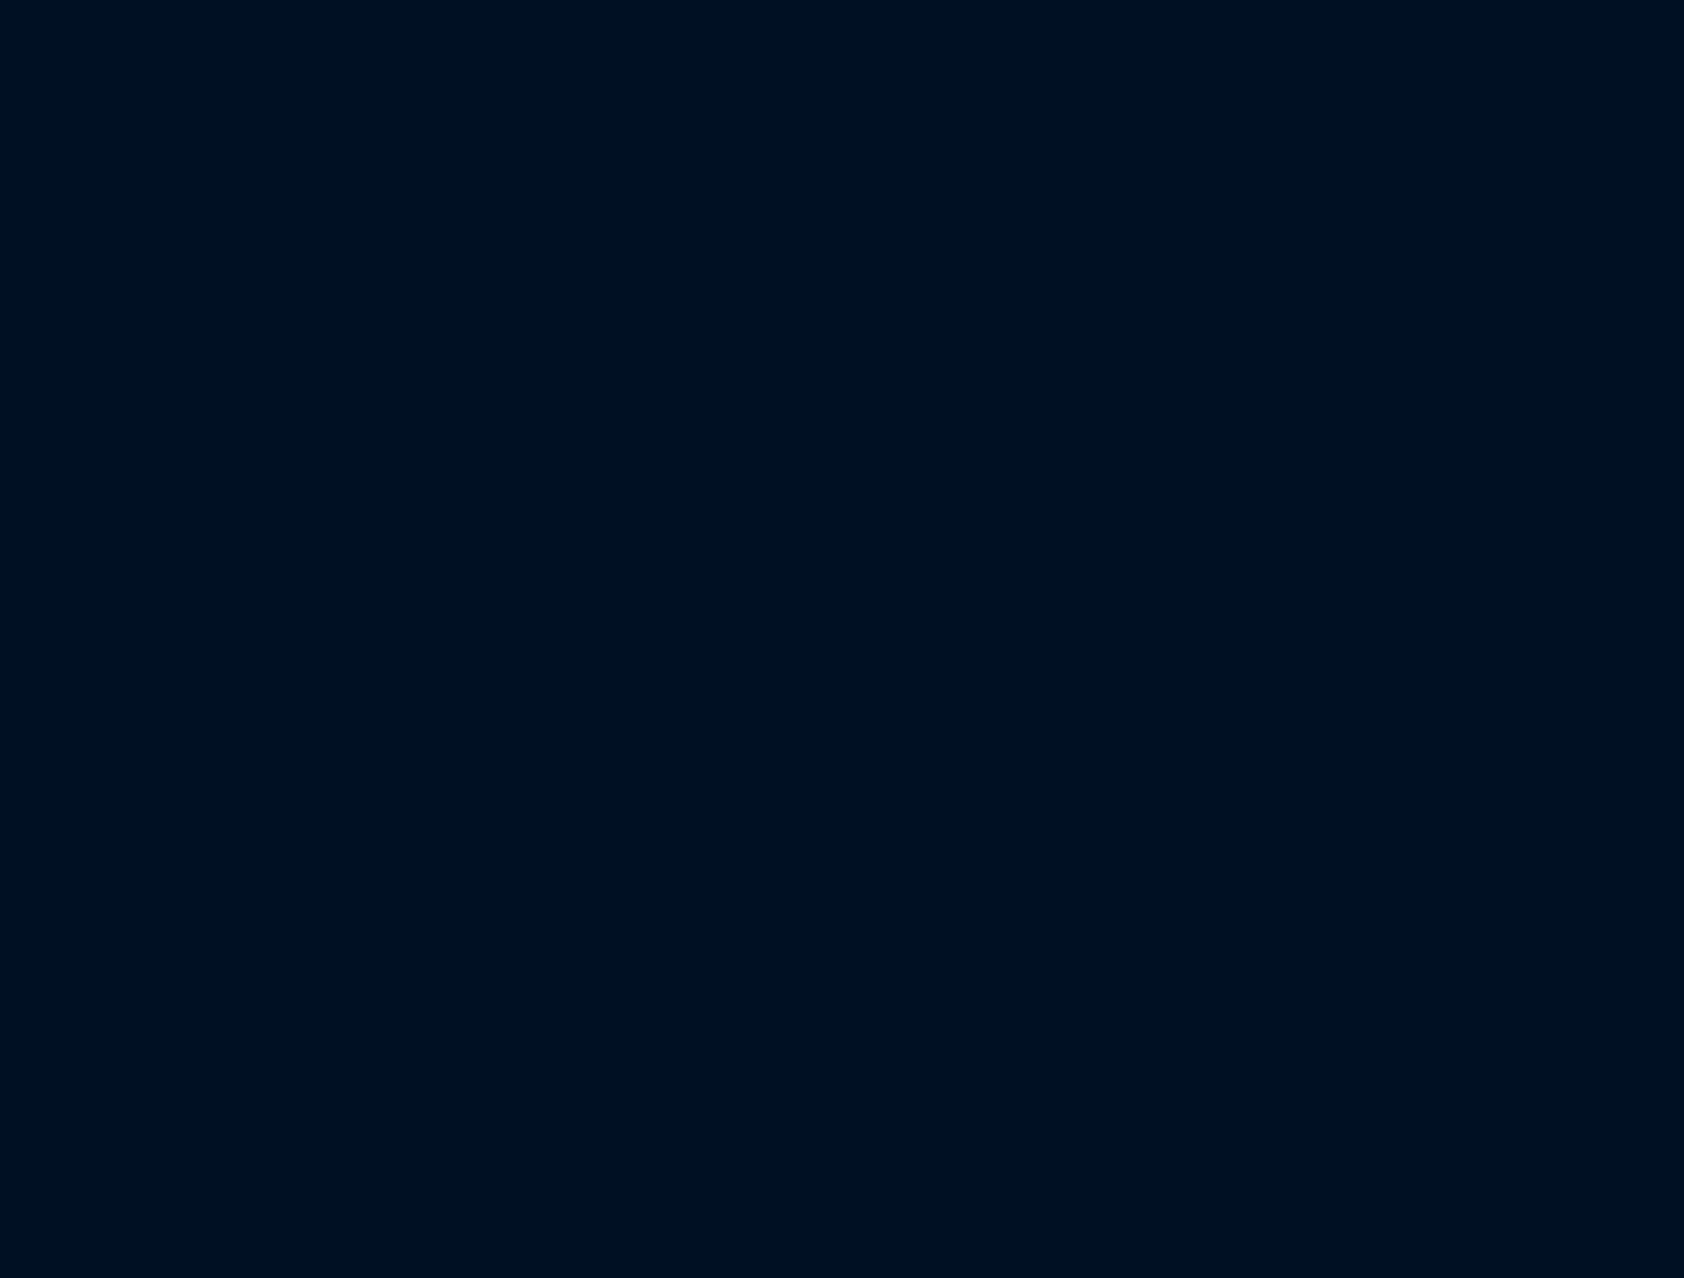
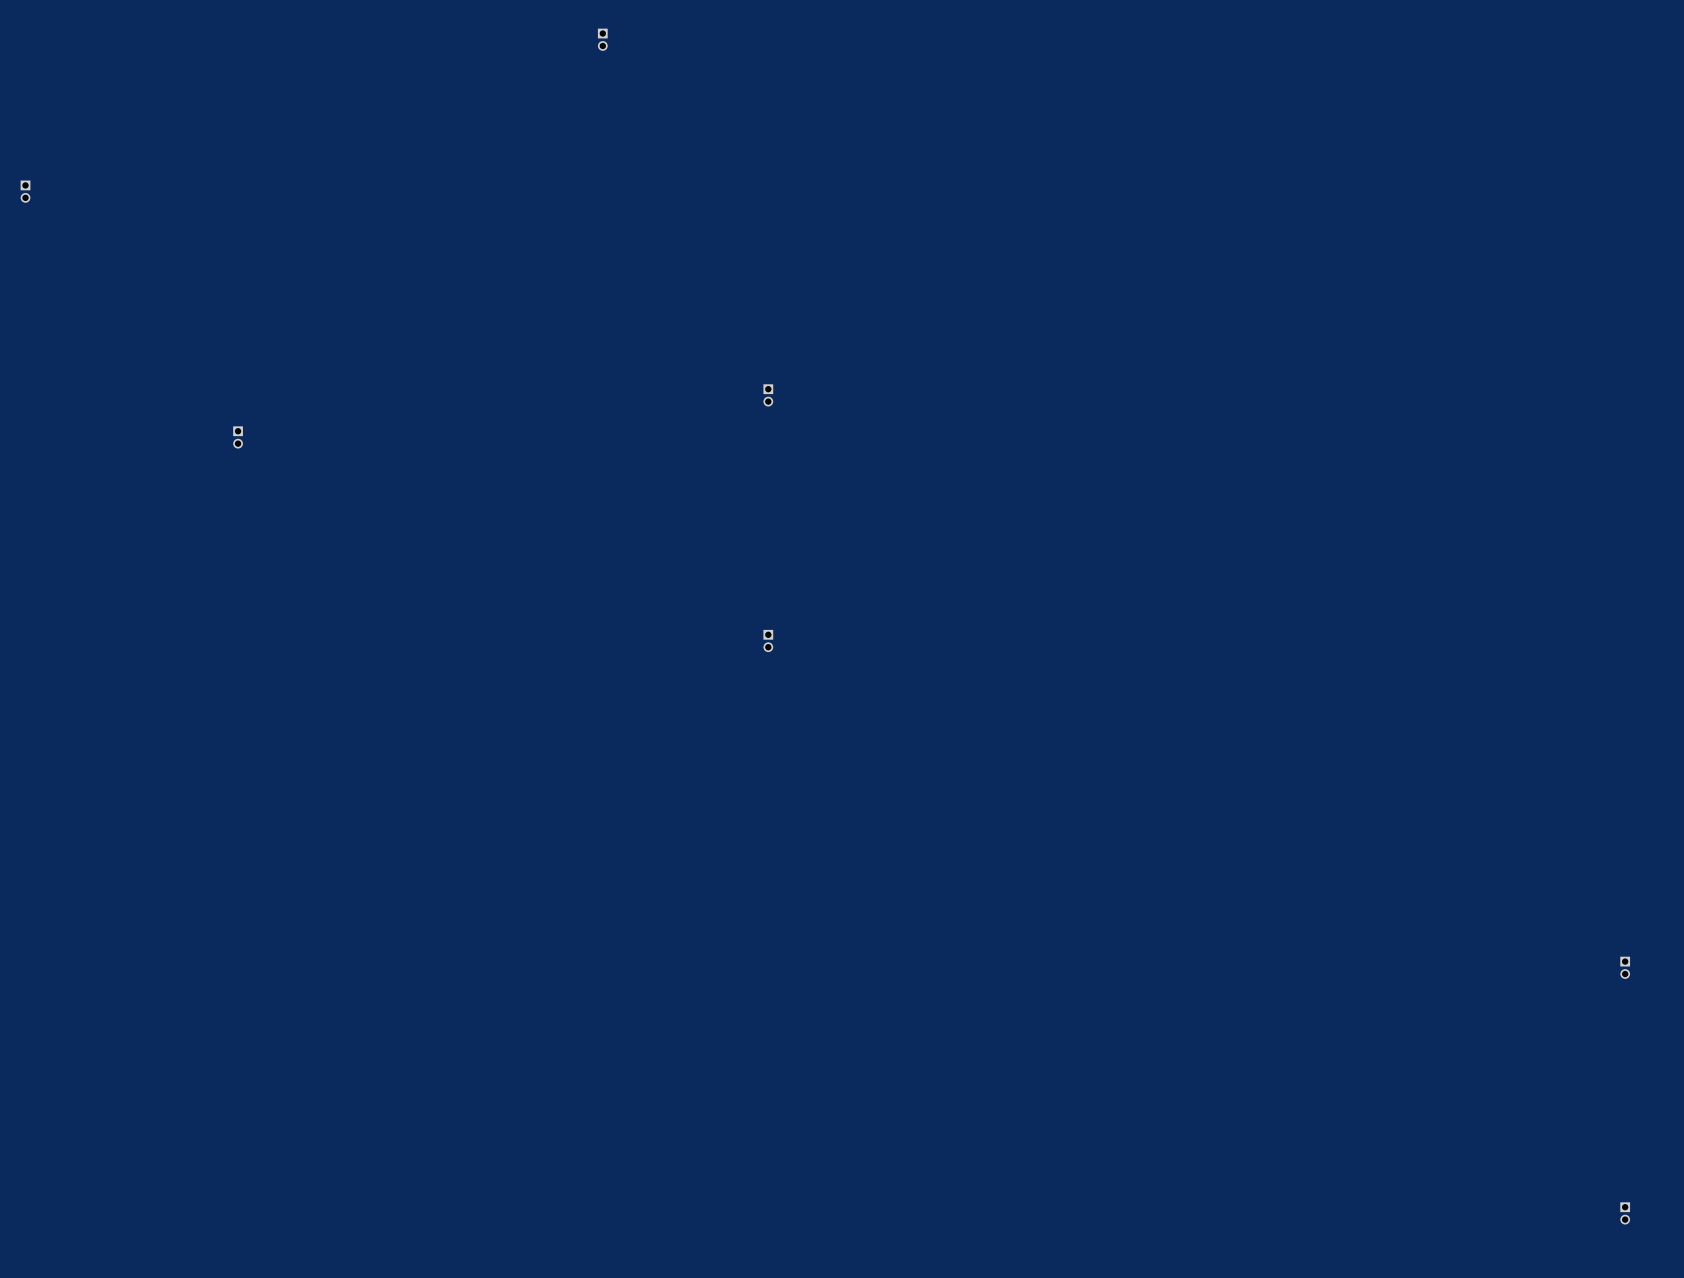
part: none -> (602, 39)
part: none -> (25, 191)
part: none -> (768, 395)
part: none -> (238, 437)
part: none -> (768, 641)
part: none -> (1625, 967)
part: none -> (1625, 1213)

